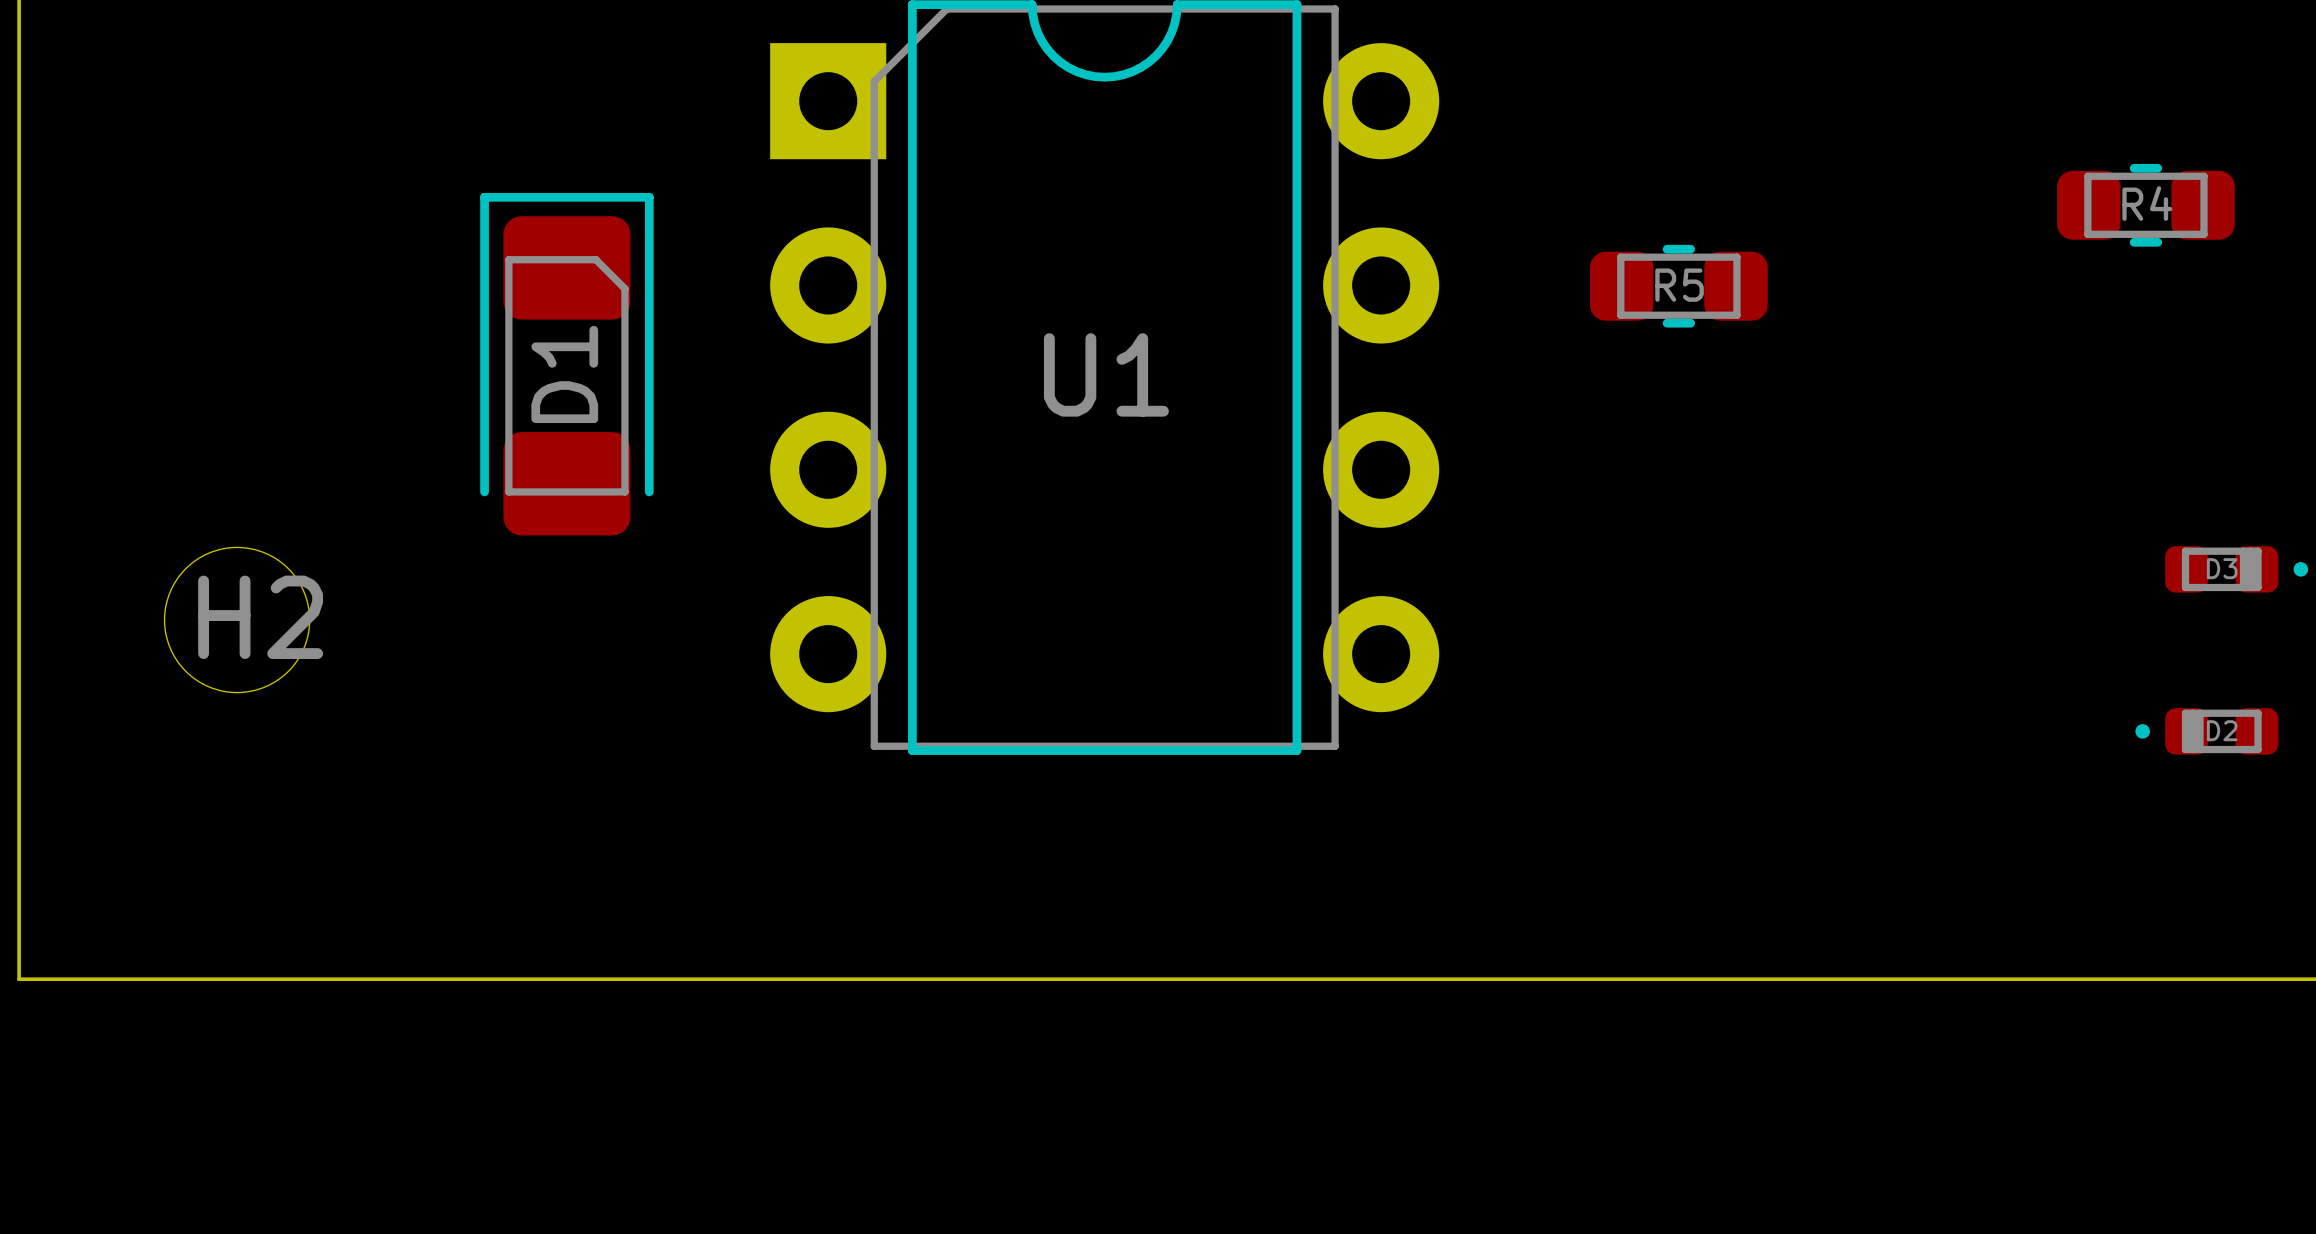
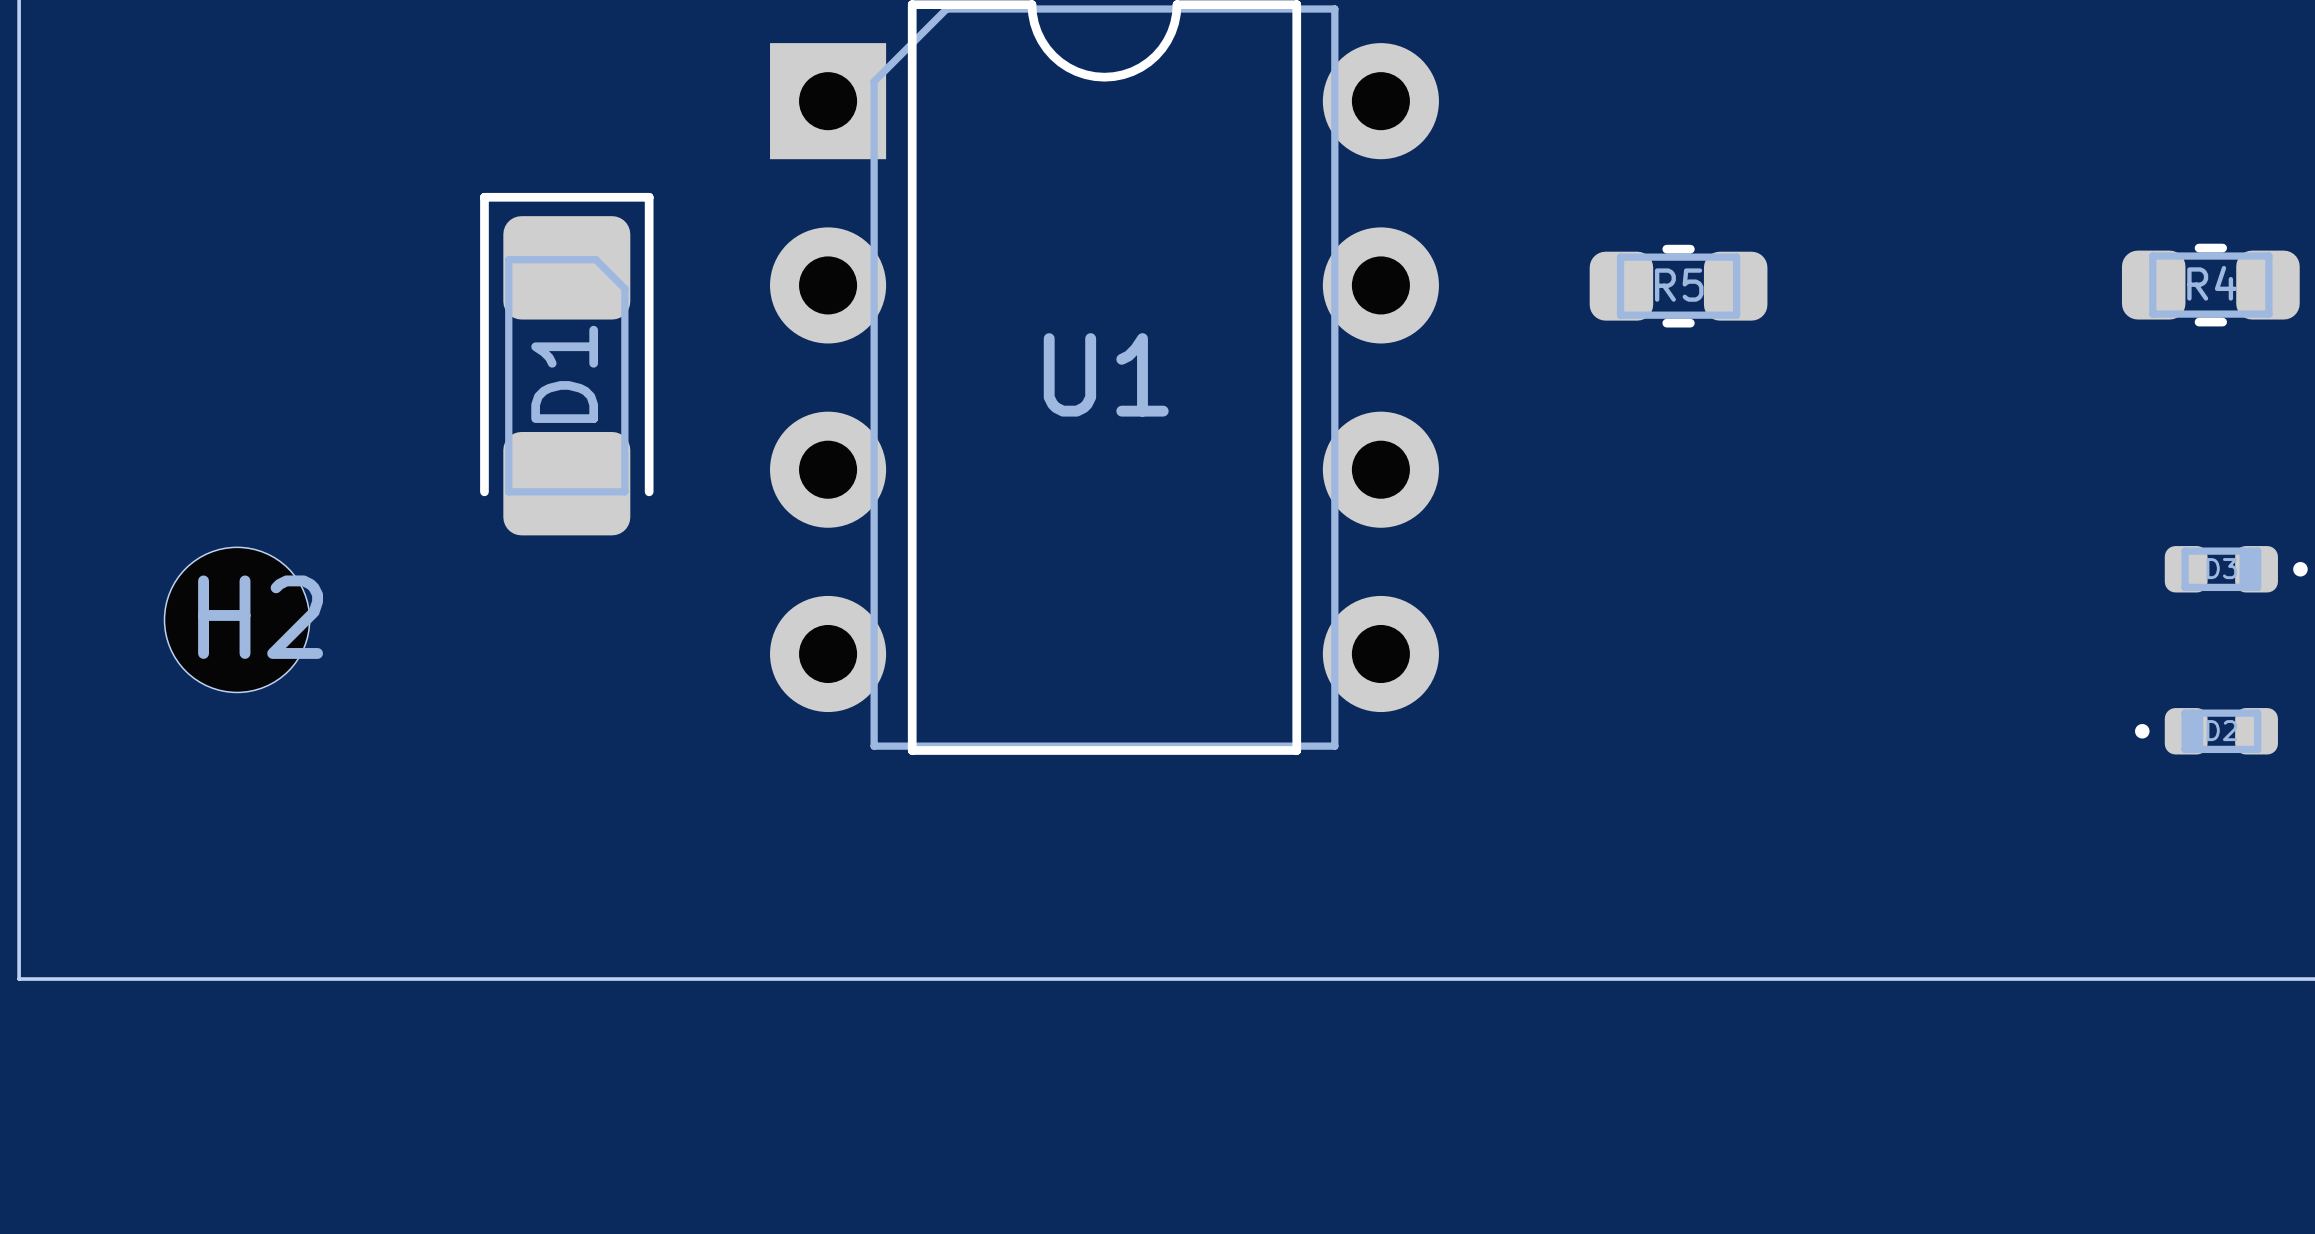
R4 position: (2145, 205) -> (2210, 285)

